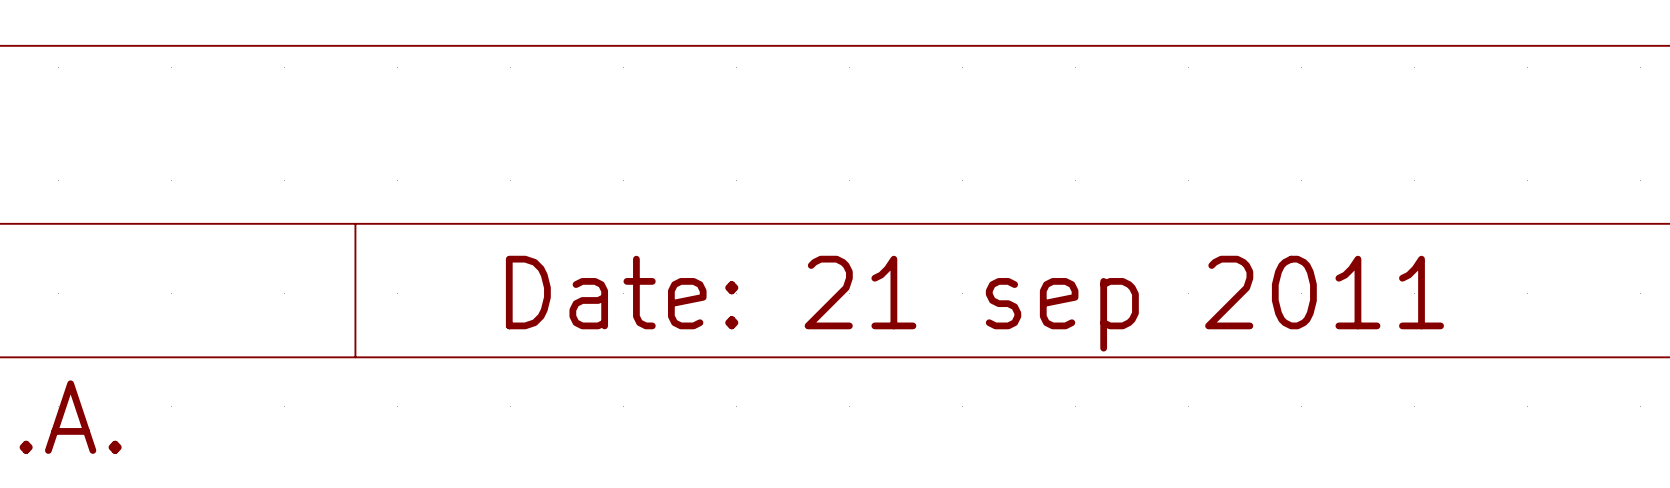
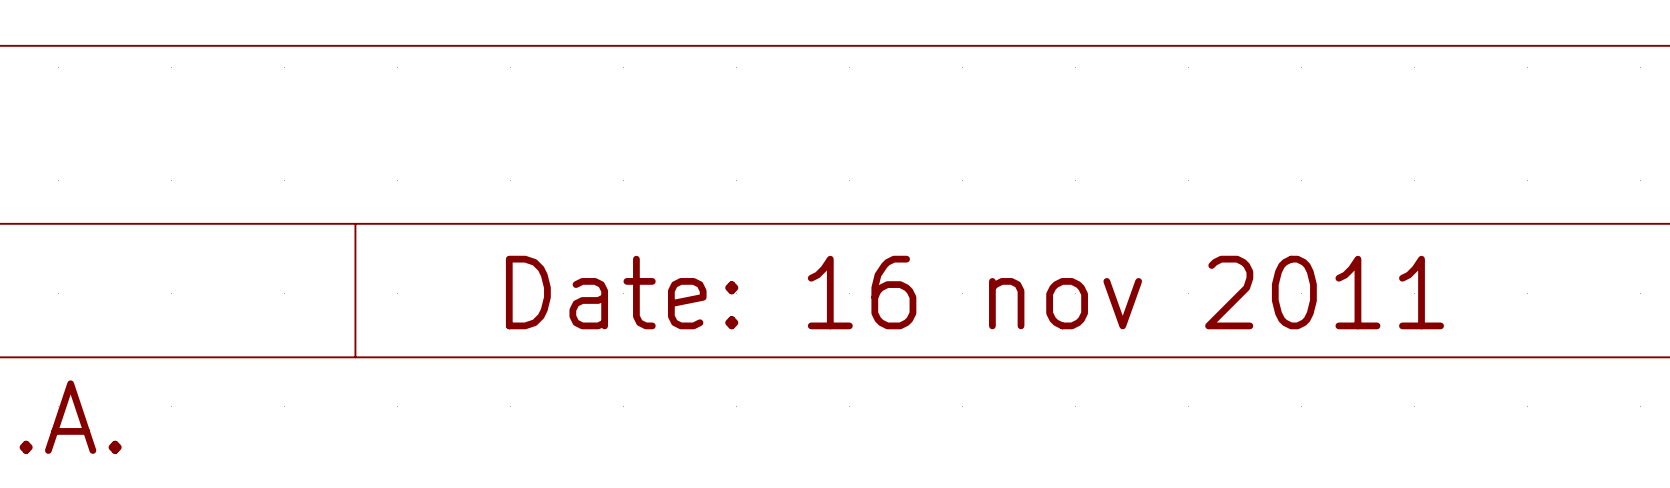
title block: Date: 21 sep 2011 (974, 303) -> Date: 16 nov 2011 (974, 292)

